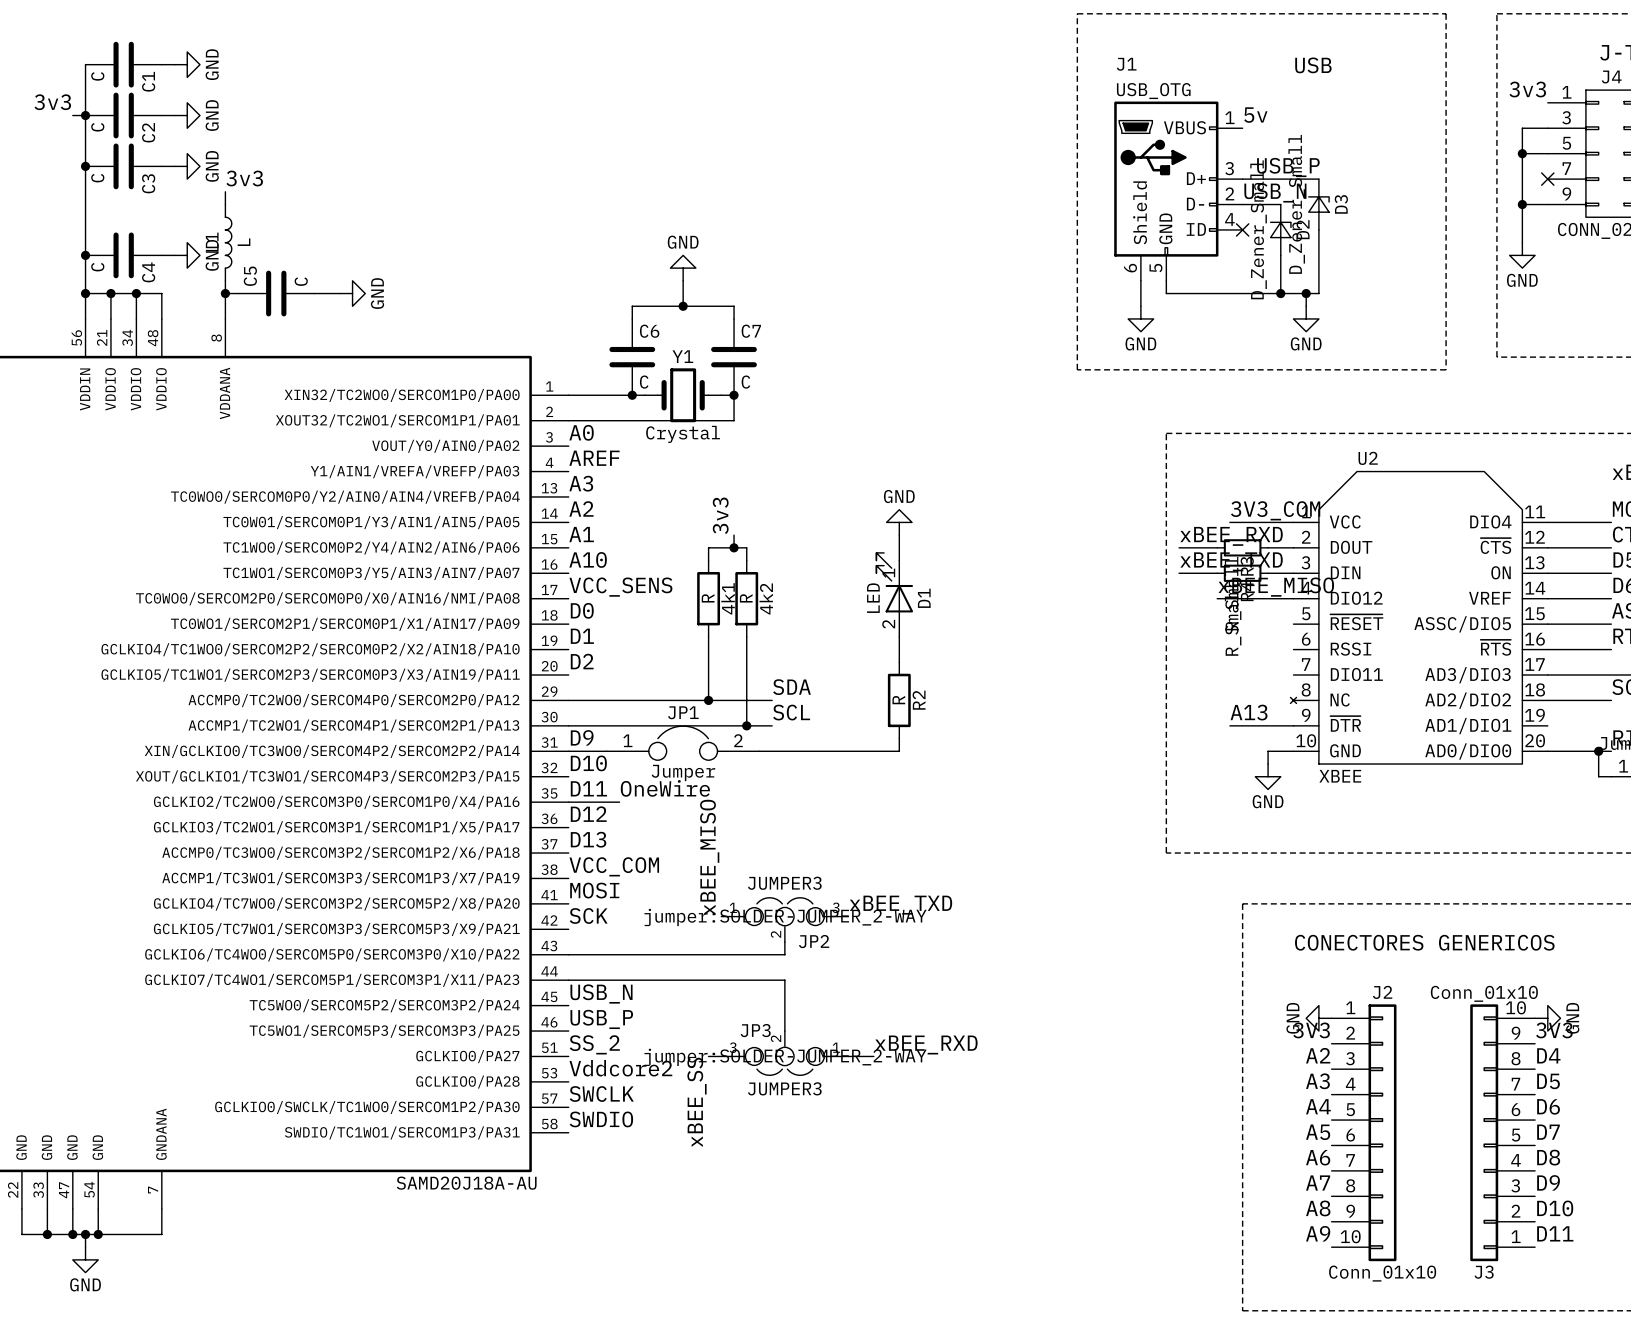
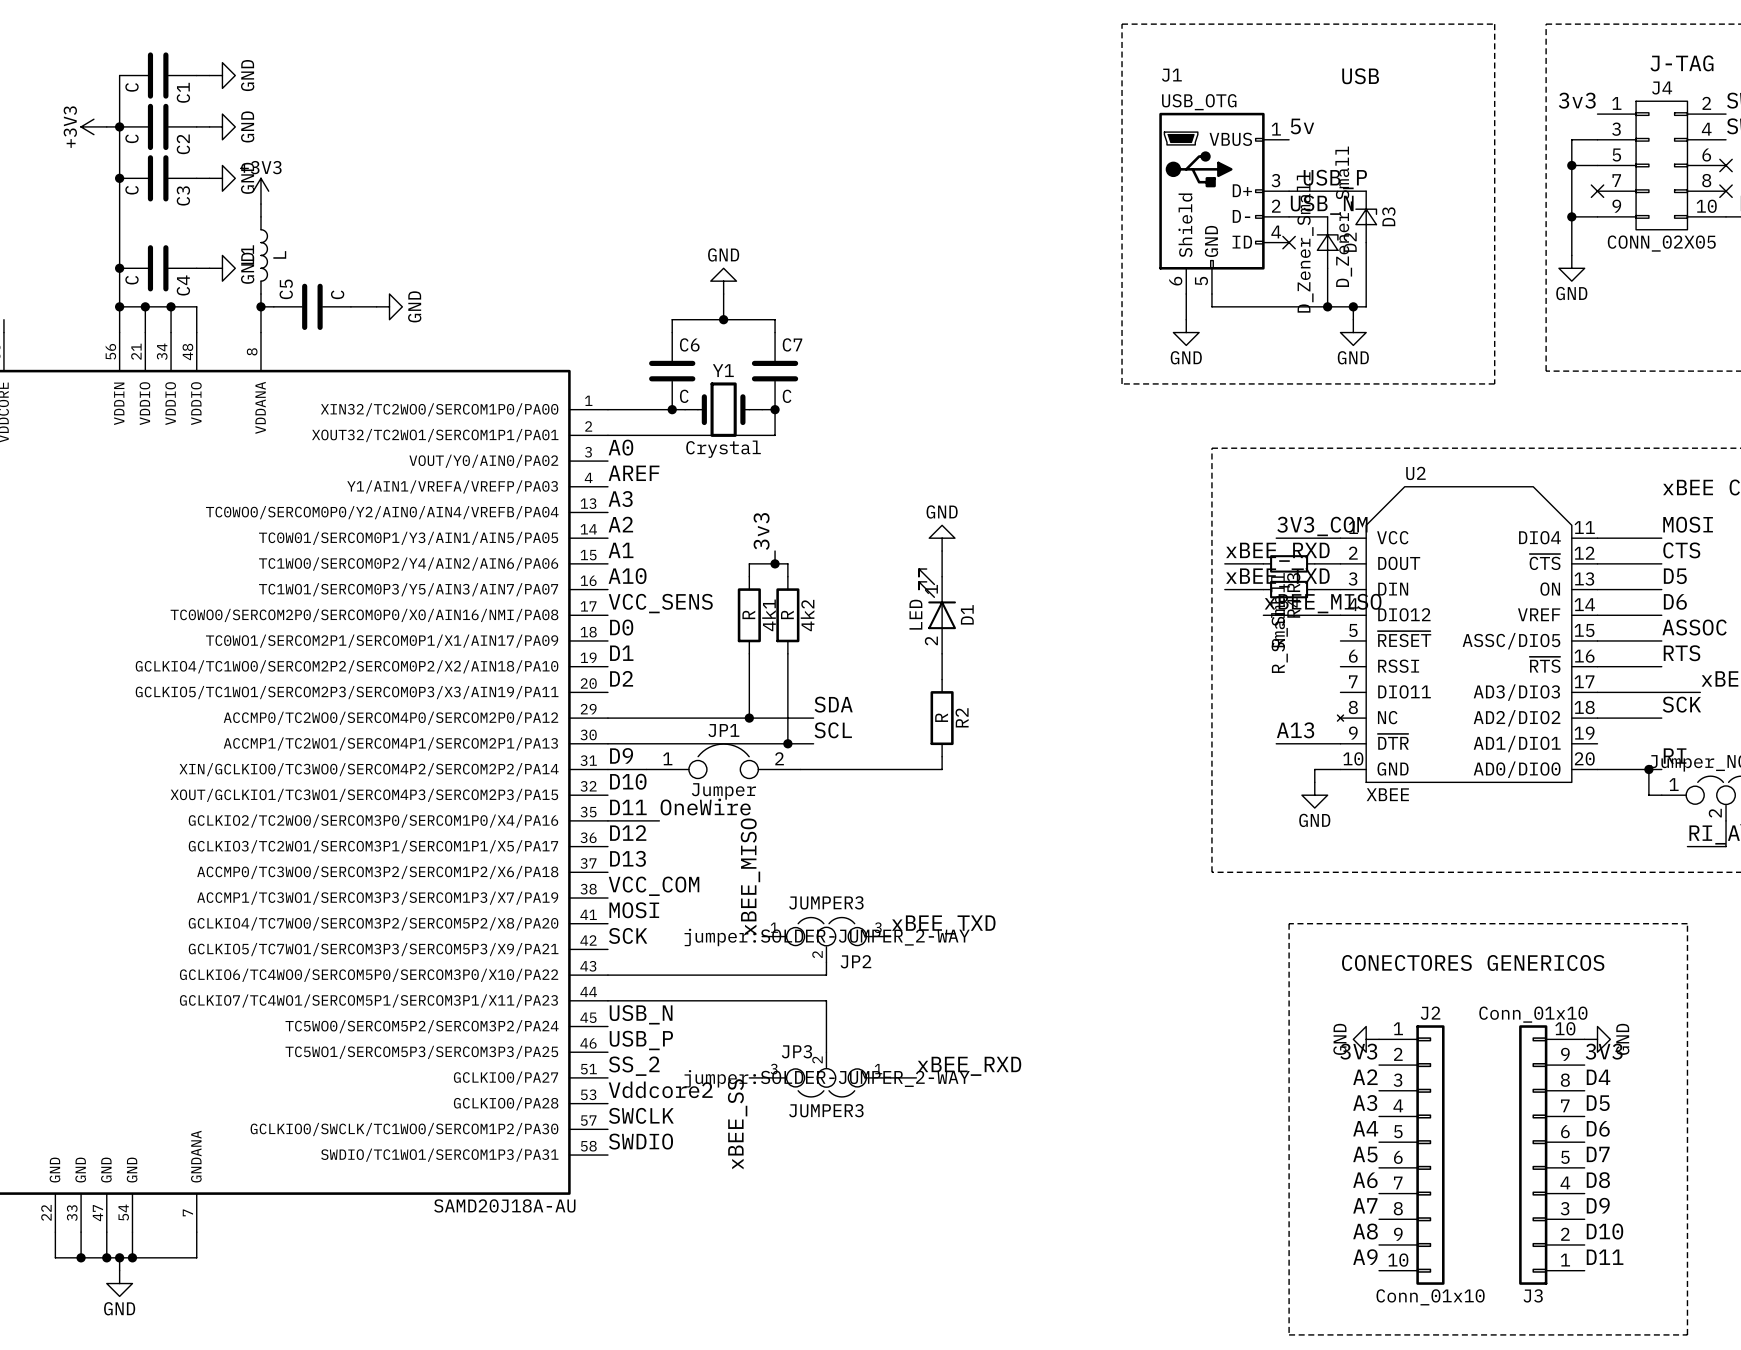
label: 3v3 (52, 102) -> none
power symbol: none -> +3V3 (93, 126)
label: 3v3 (244, 178) -> none
power symbol: none -> +3V3 (260, 191)

